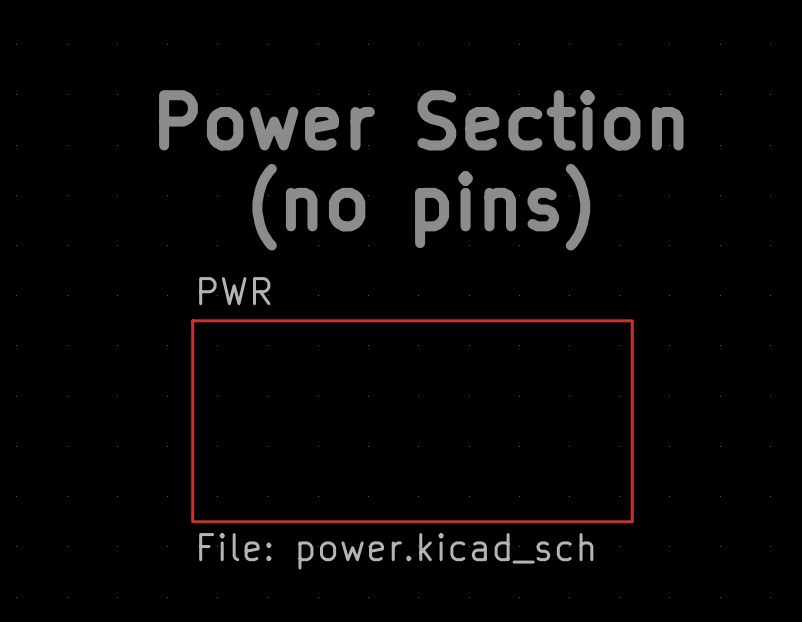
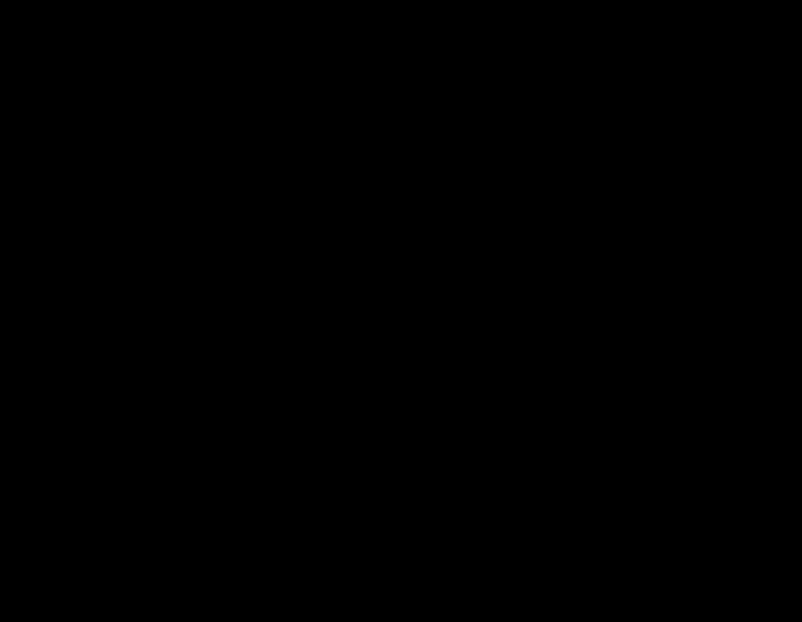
text: Power Section (421, 120) -> none
text: (no pins) (421, 207) -> none
sheet PWR: File: power.kicad_sch (412, 421) -> none

